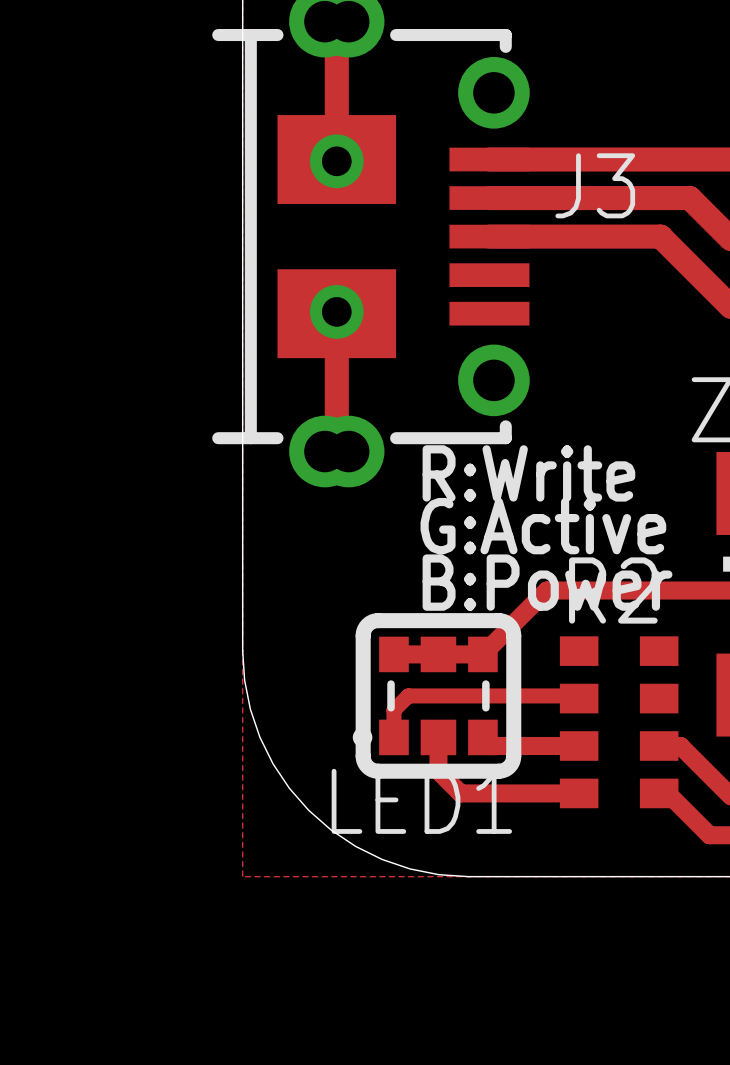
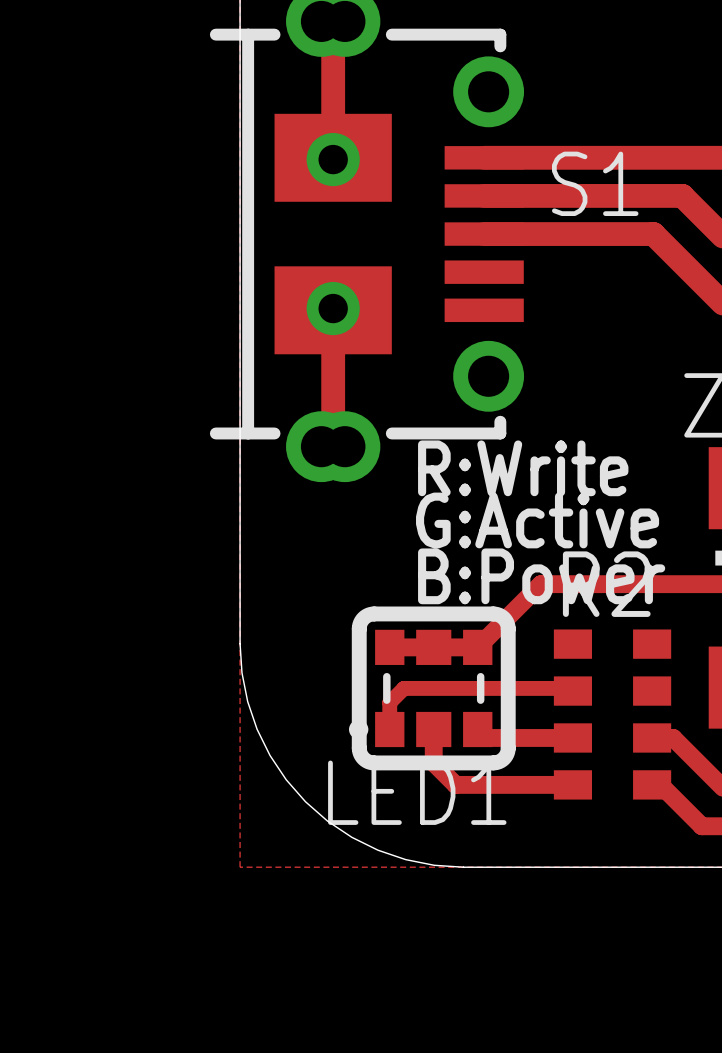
J3 name: J3 (595, 185) -> S1 (595, 183)

